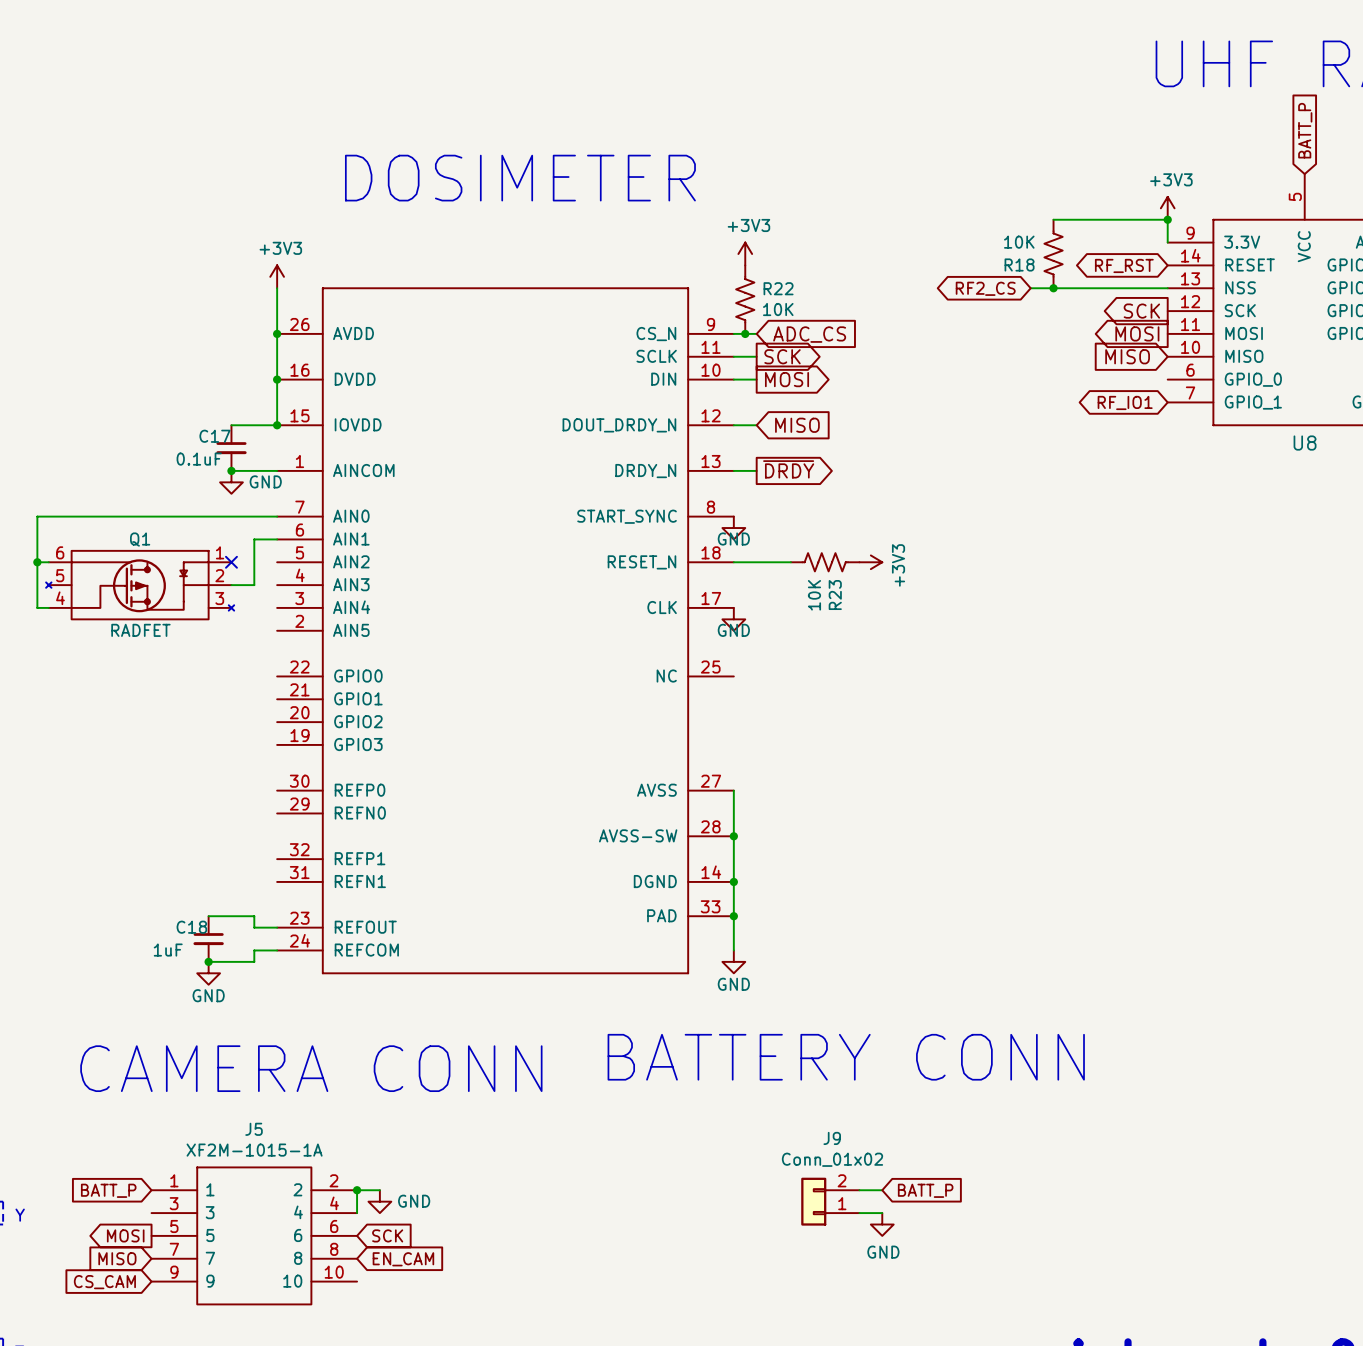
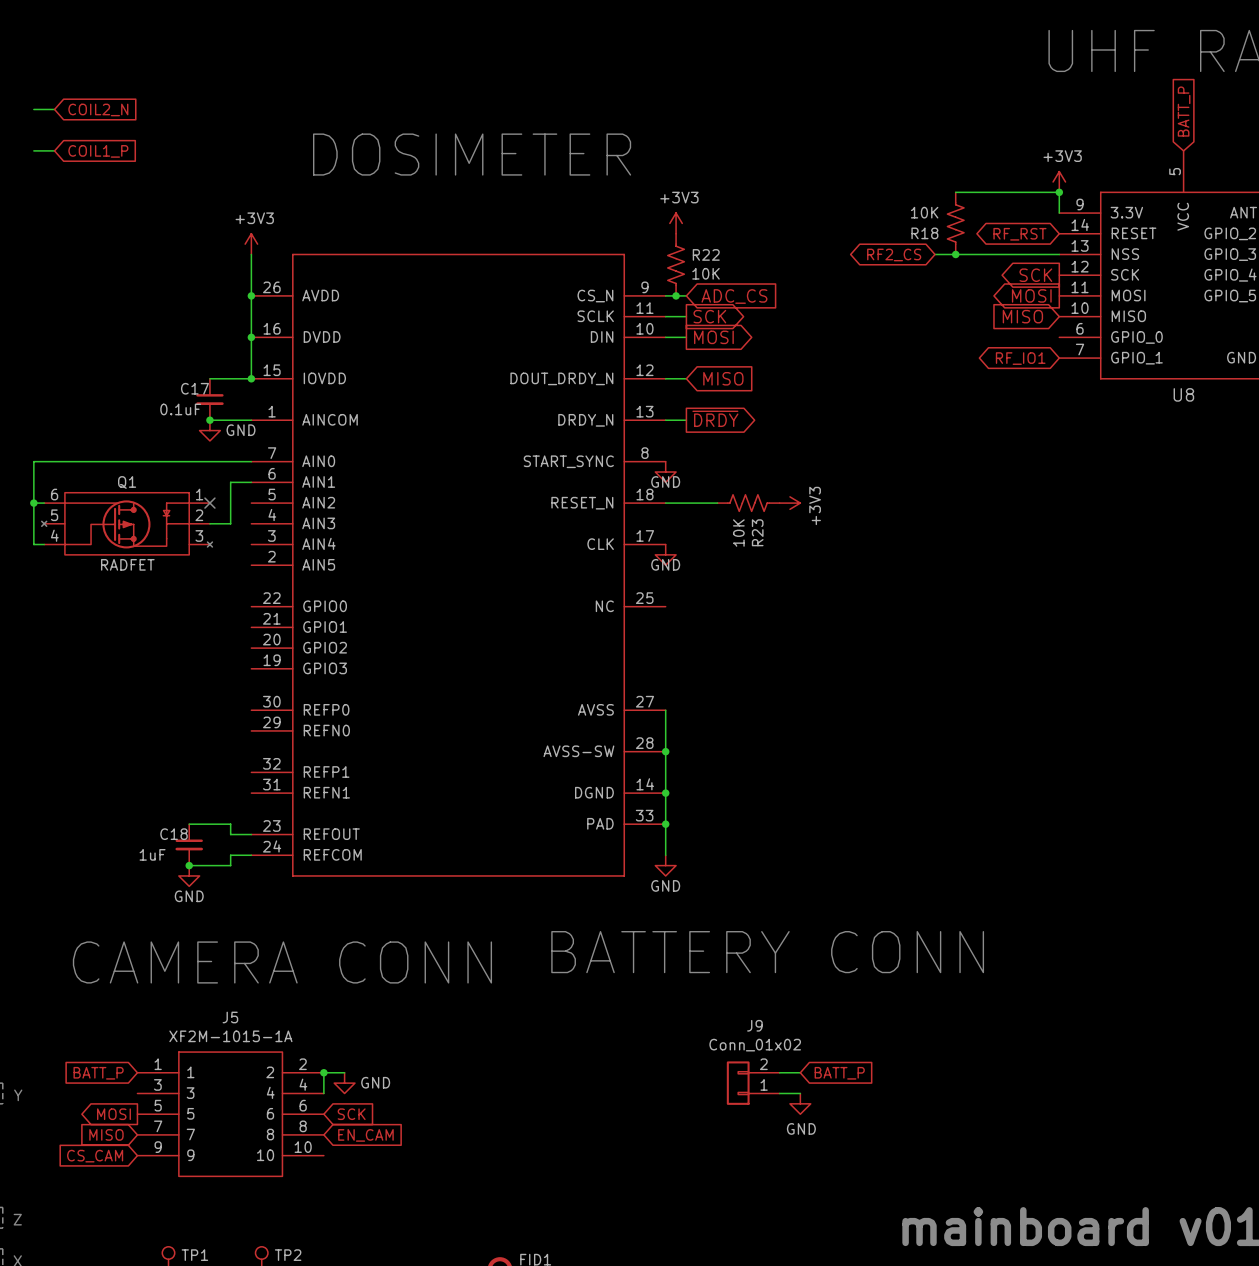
wire: none -> (33, 109) (54, 109)
global label: none -> COIL2_N (98, 109)
wire: none -> (33, 150) (54, 150)
global label: none -> COIL1_P (98, 151)

